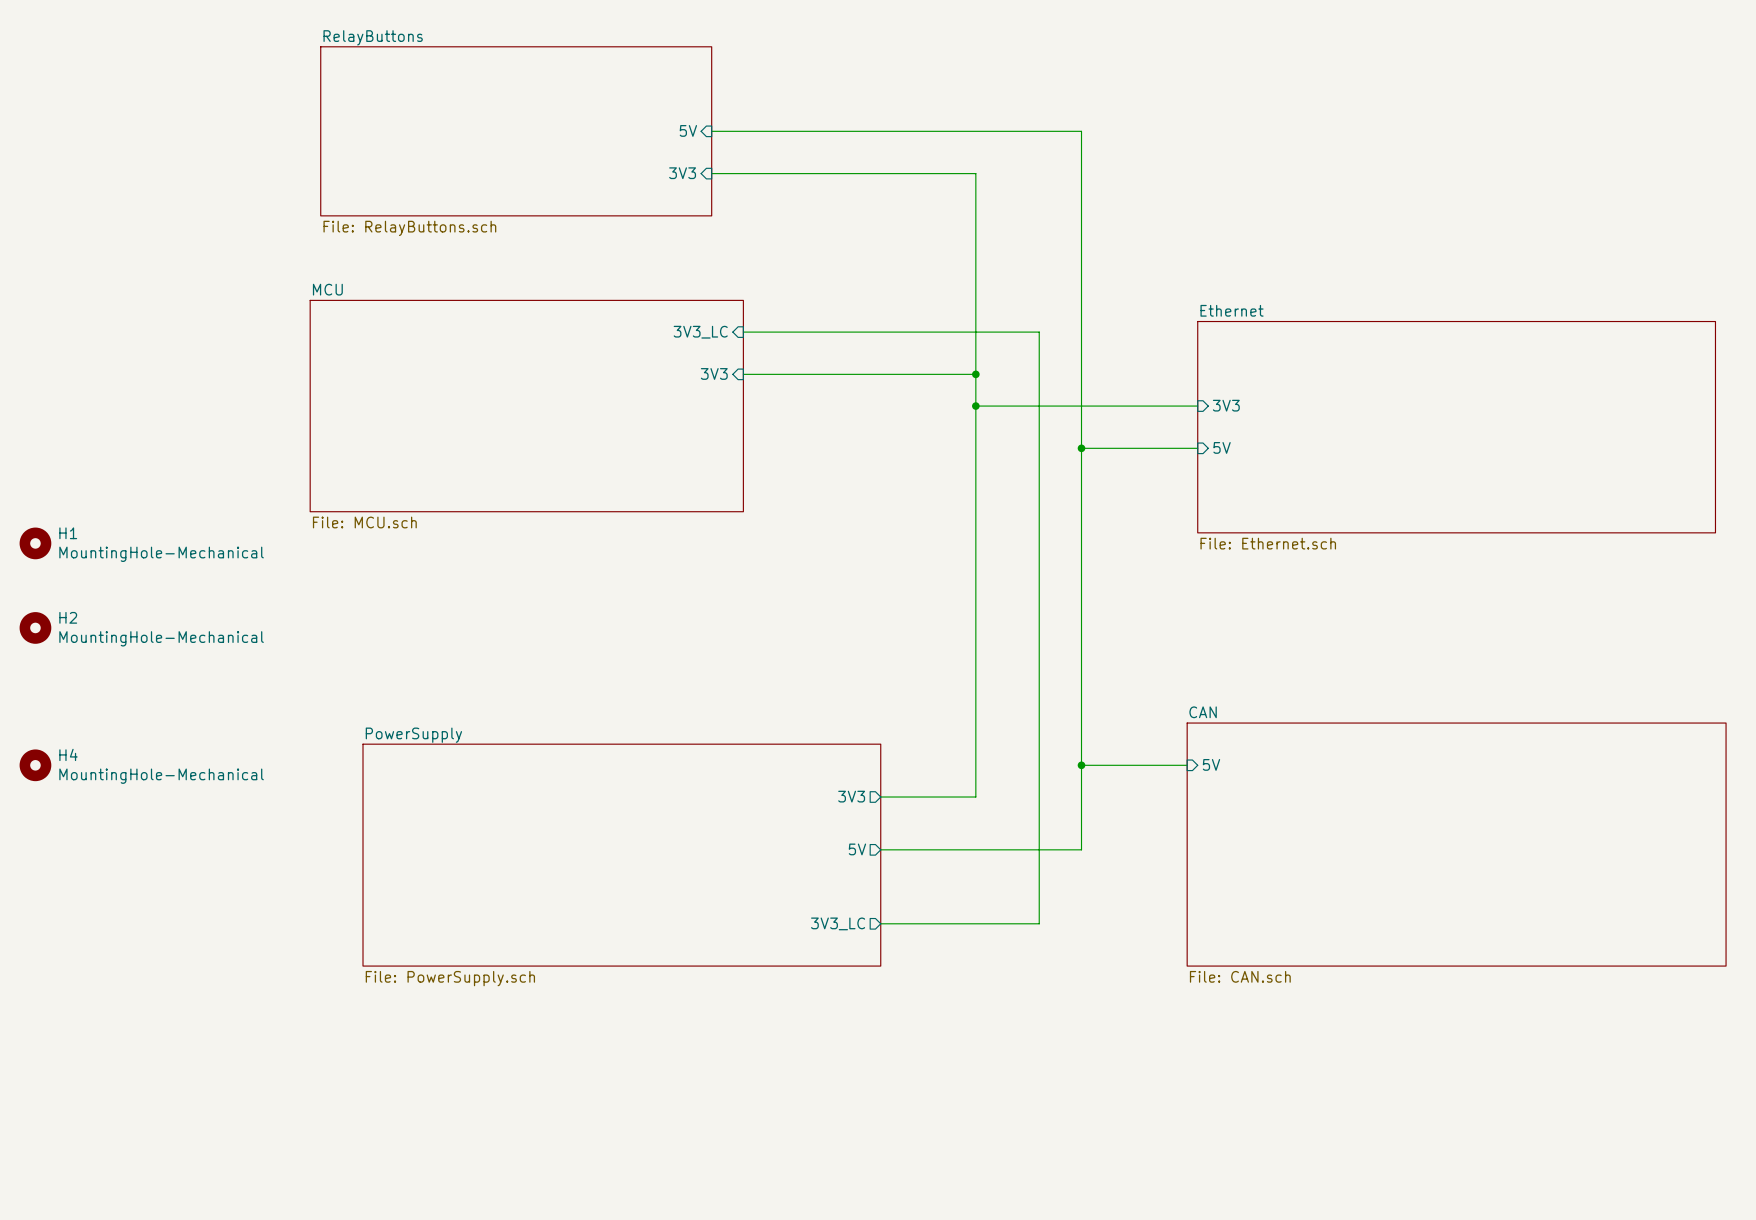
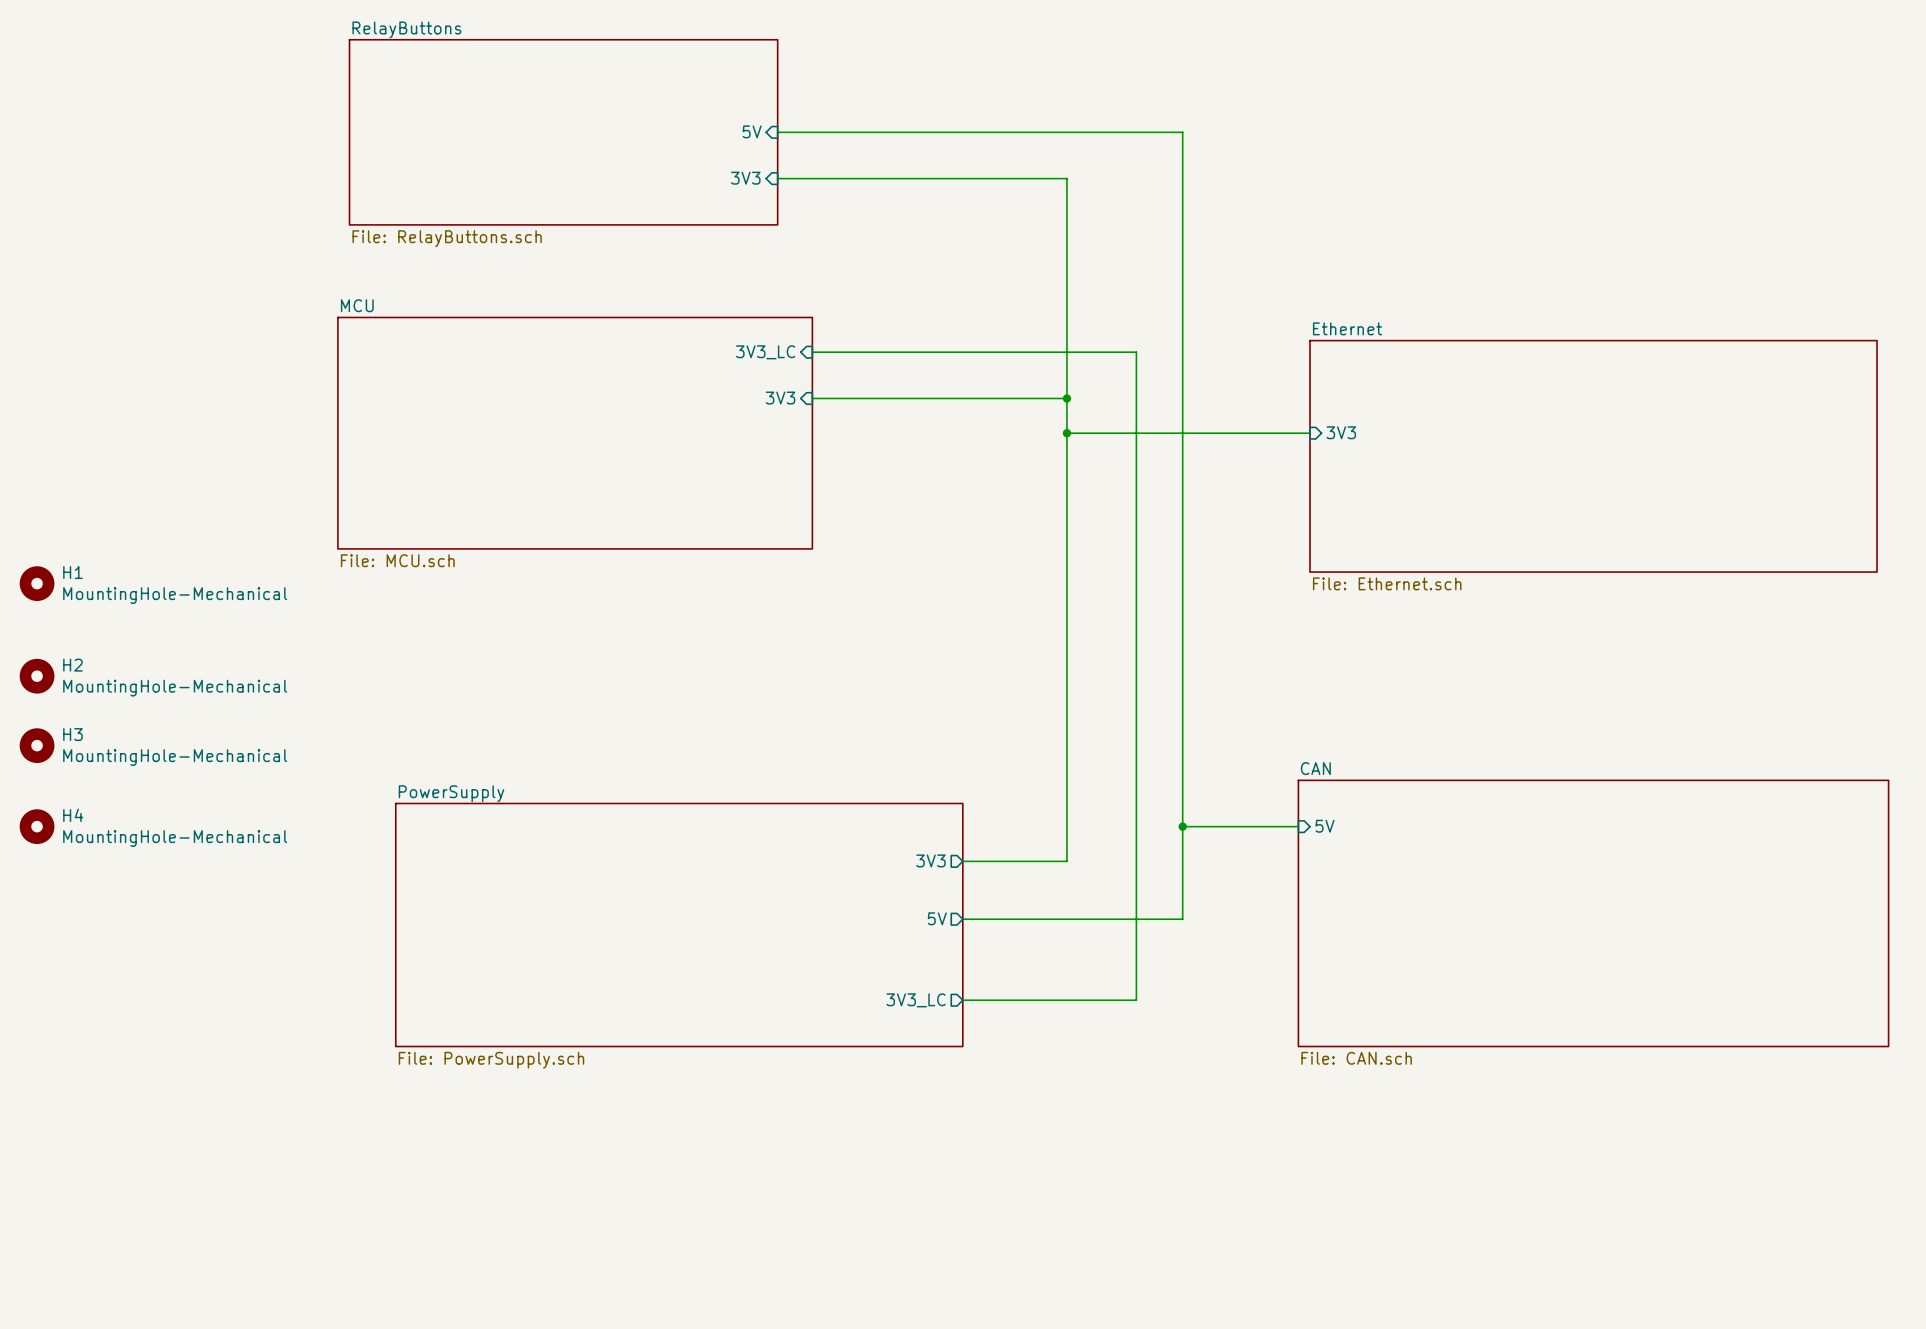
sheet pin: 5V (1222, 447) -> none
wire: (1081, 448) (1197, 448) -> none
junction: (1081, 448) -> none
H3: none -> MountingHole-Mechanical (37, 745)

